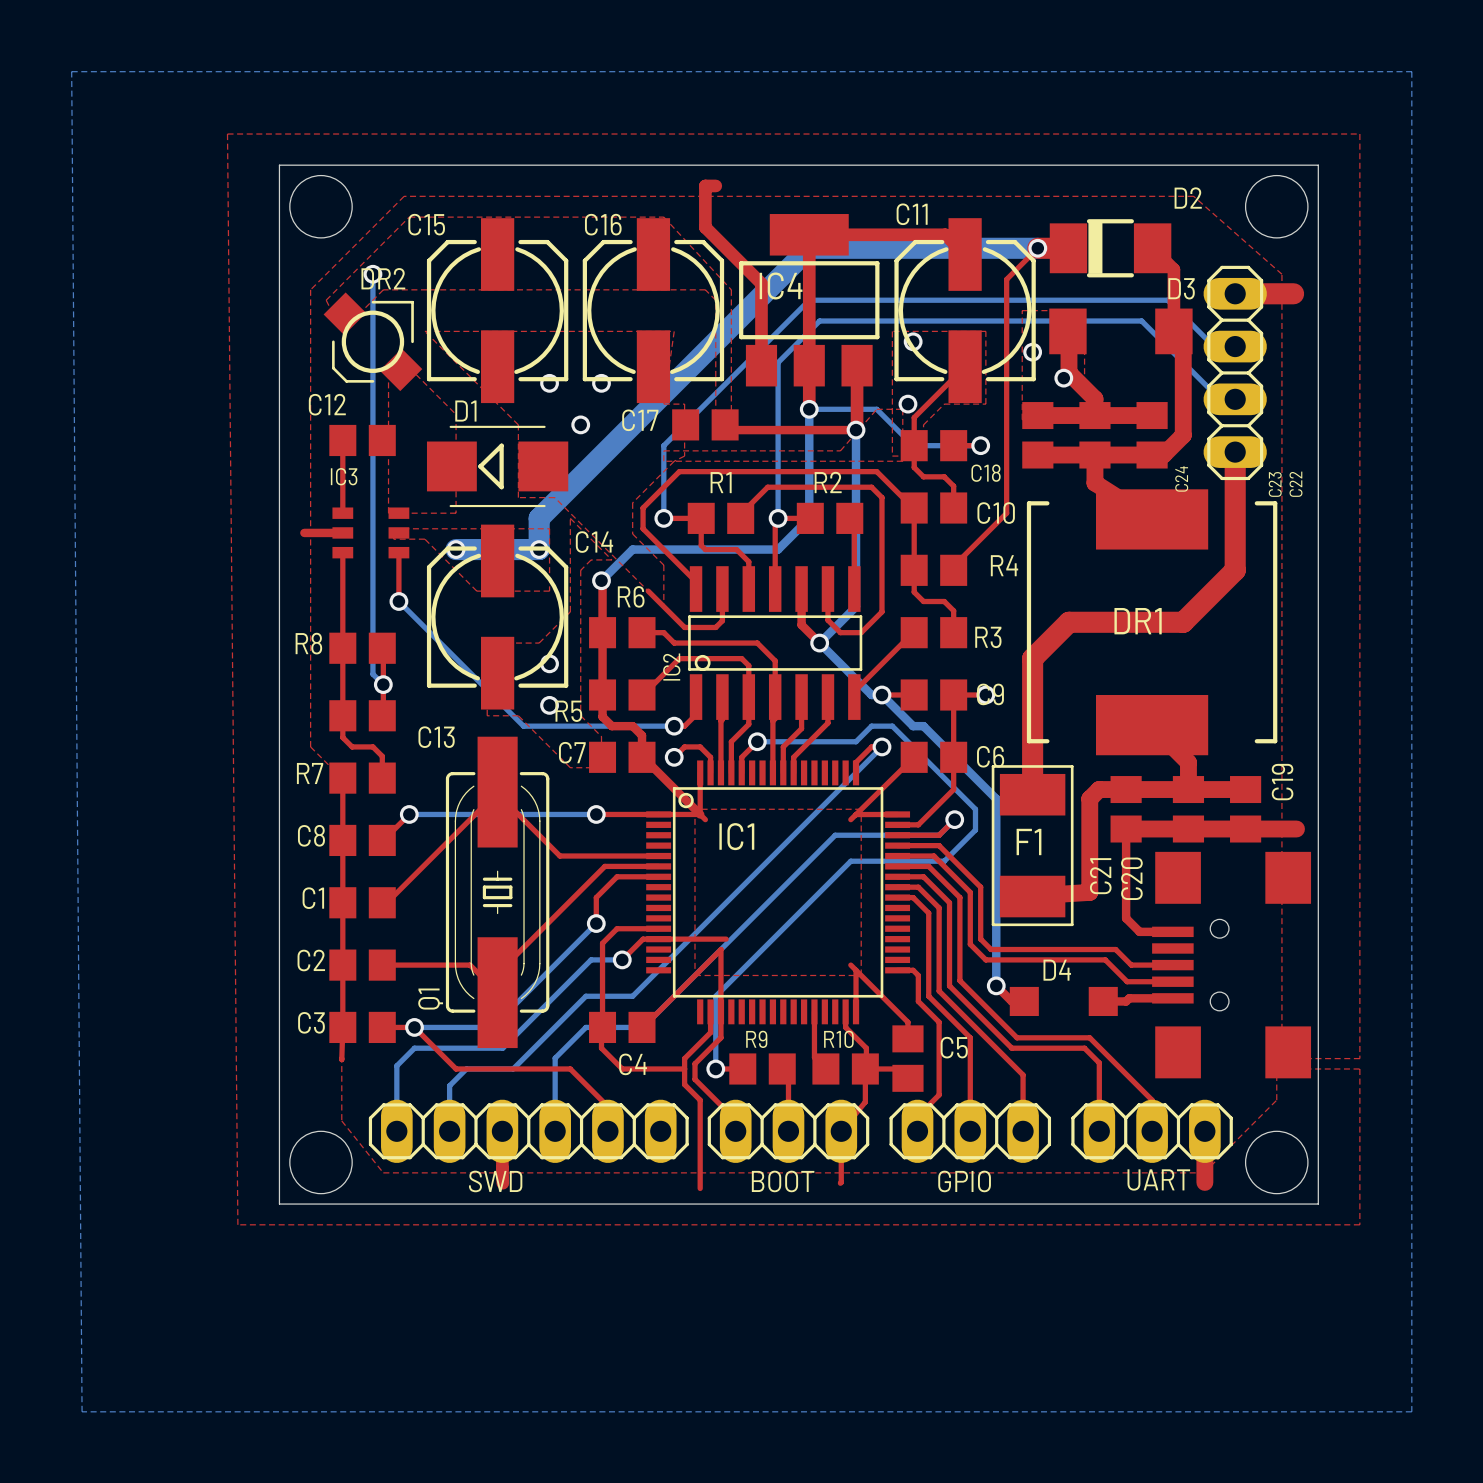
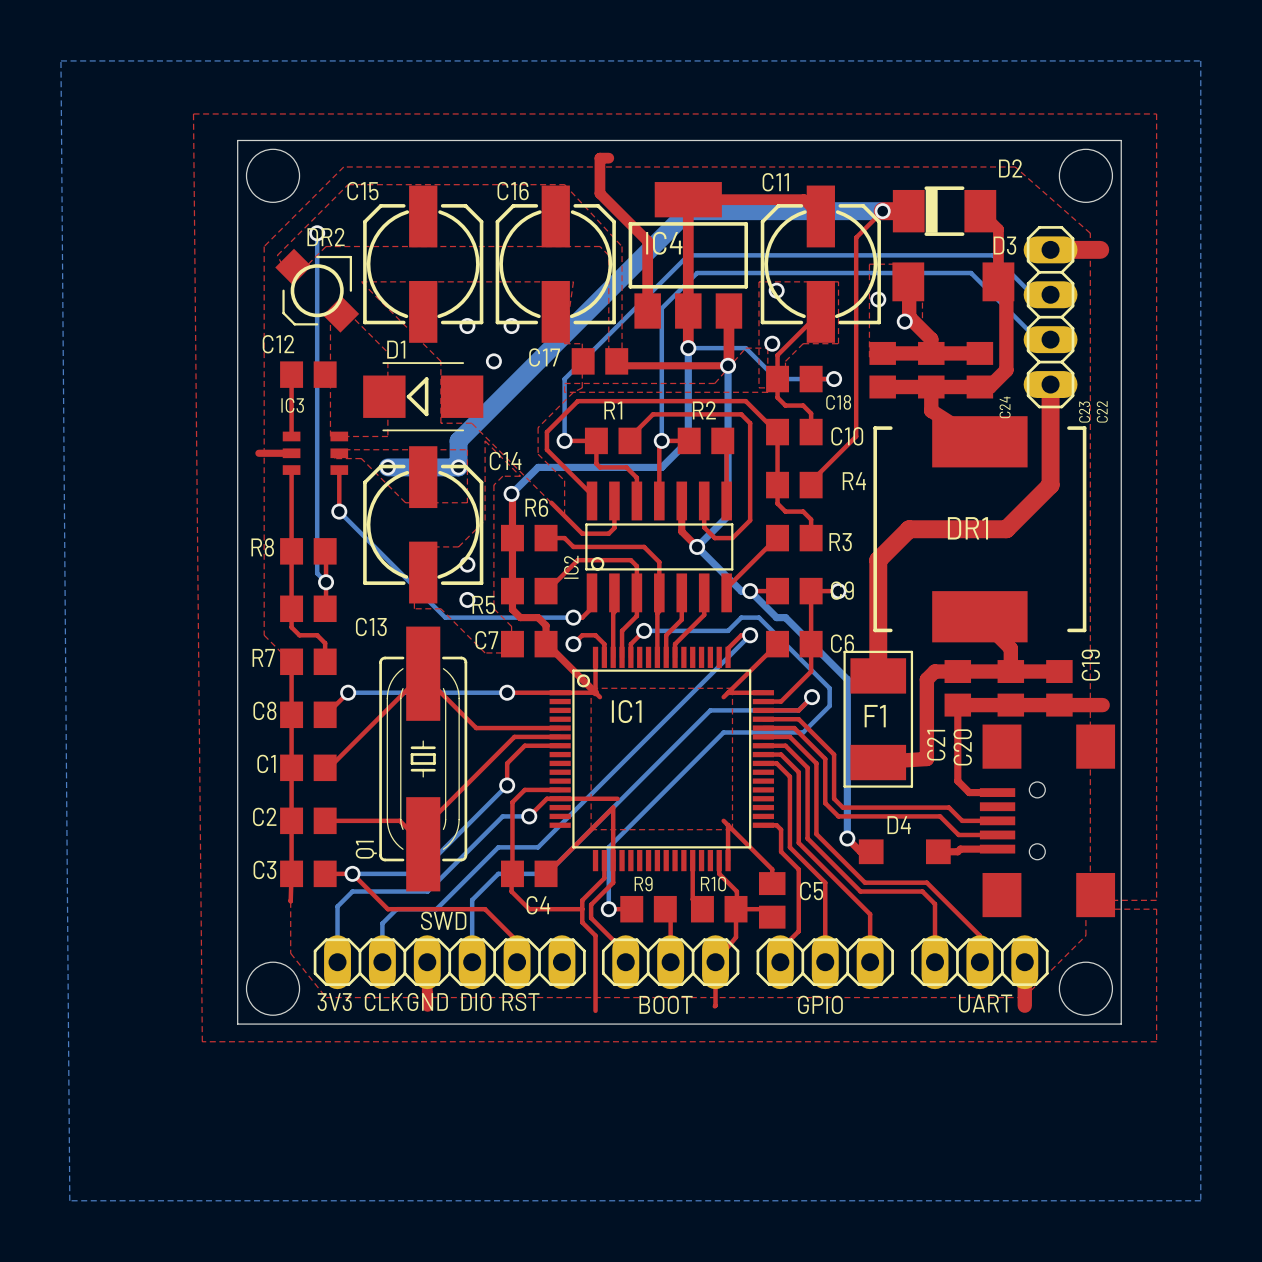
text: none -> 3V3 (334, 1002)
text: none -> CLK (383, 1001)
text: none -> GND (427, 1001)
text: none -> DIO (476, 1001)
text: none -> RST (521, 1001)
SWD name position: SWD (495, 1181) -> SWD (443, 920)

